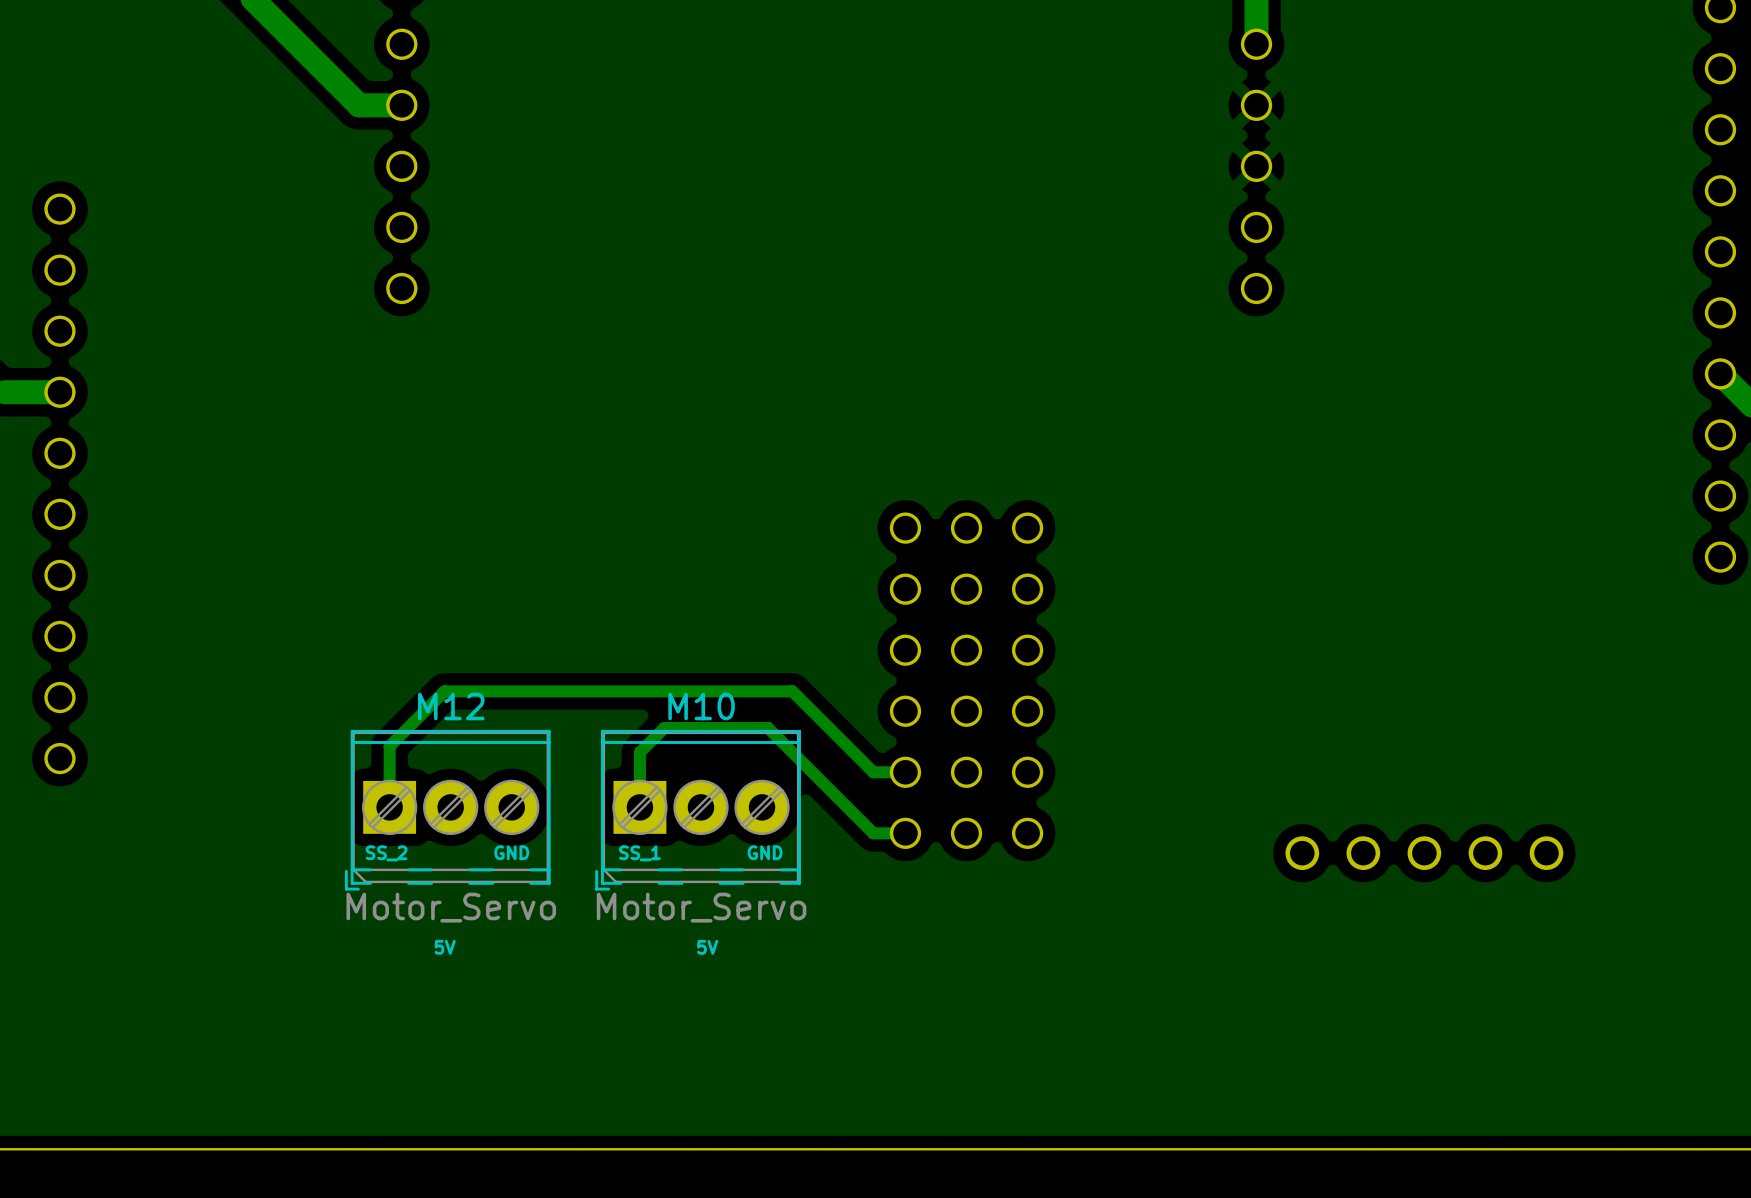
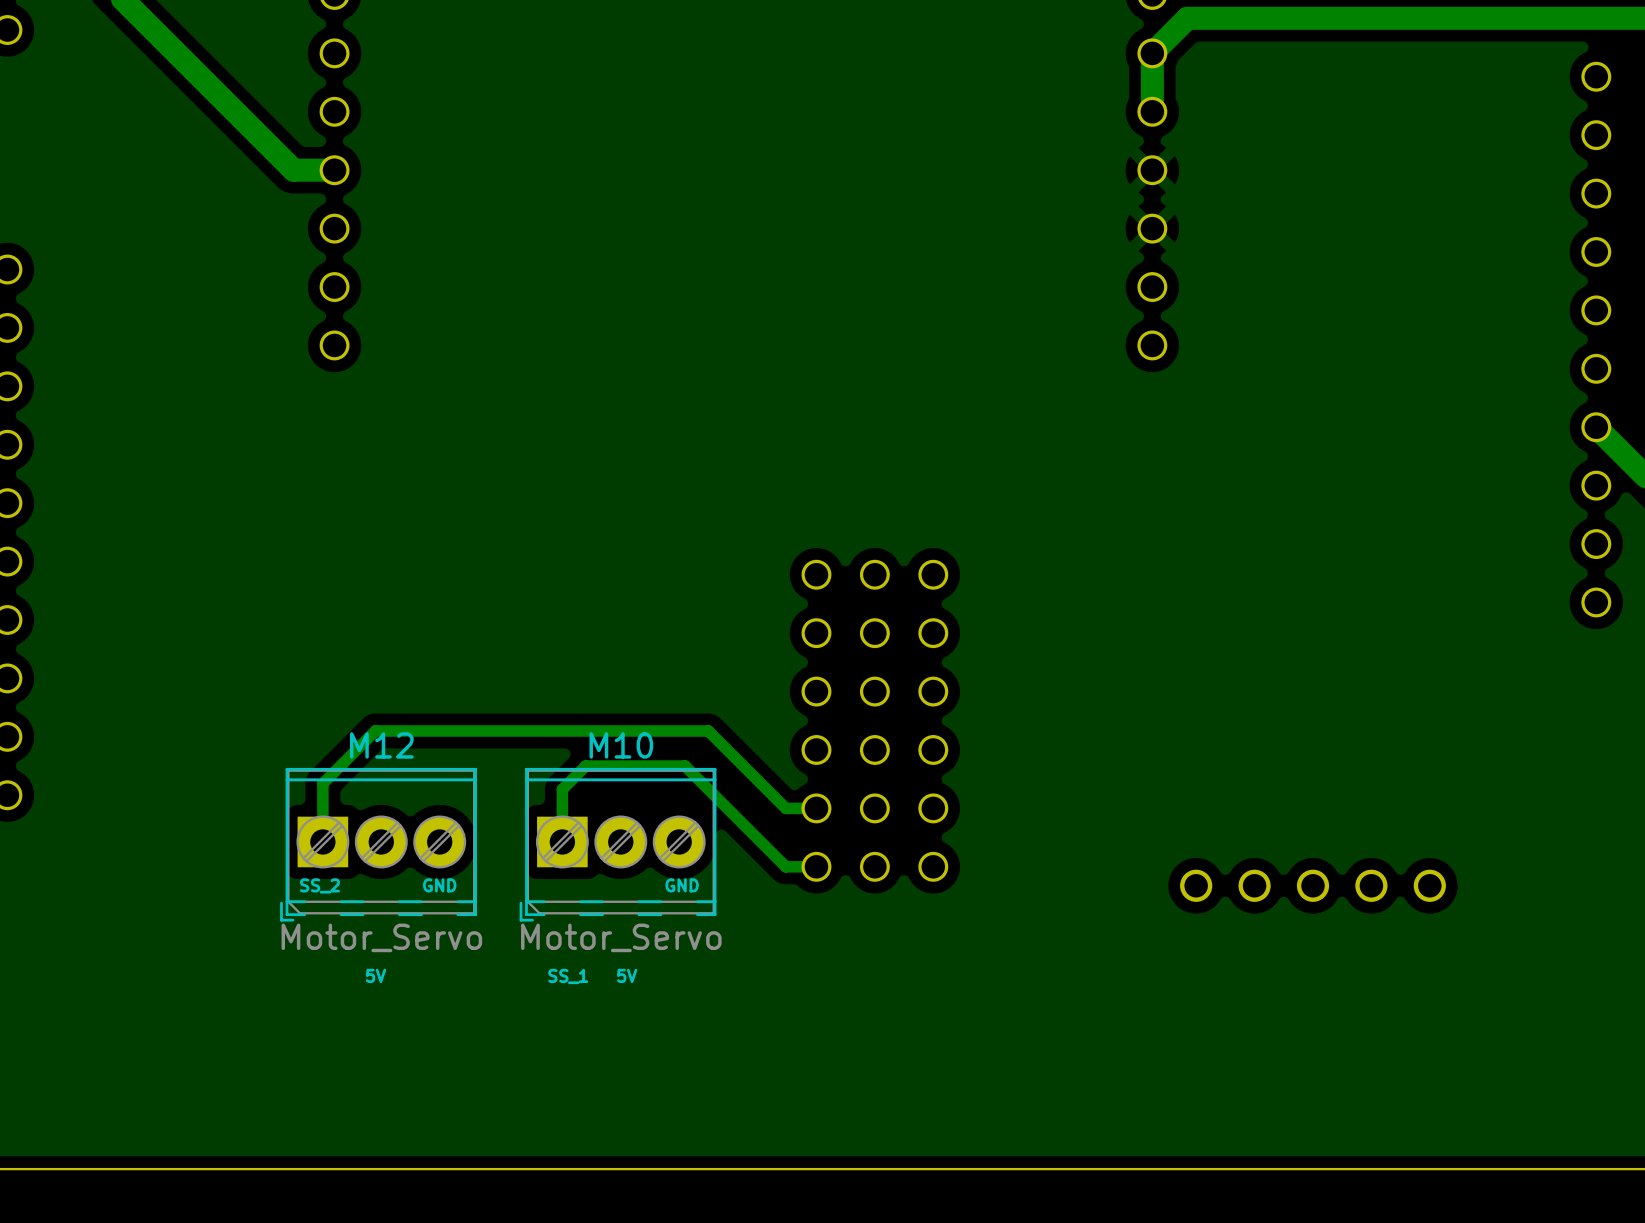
text position: SS_1 (639, 853) -> SS_1 (568, 976)

